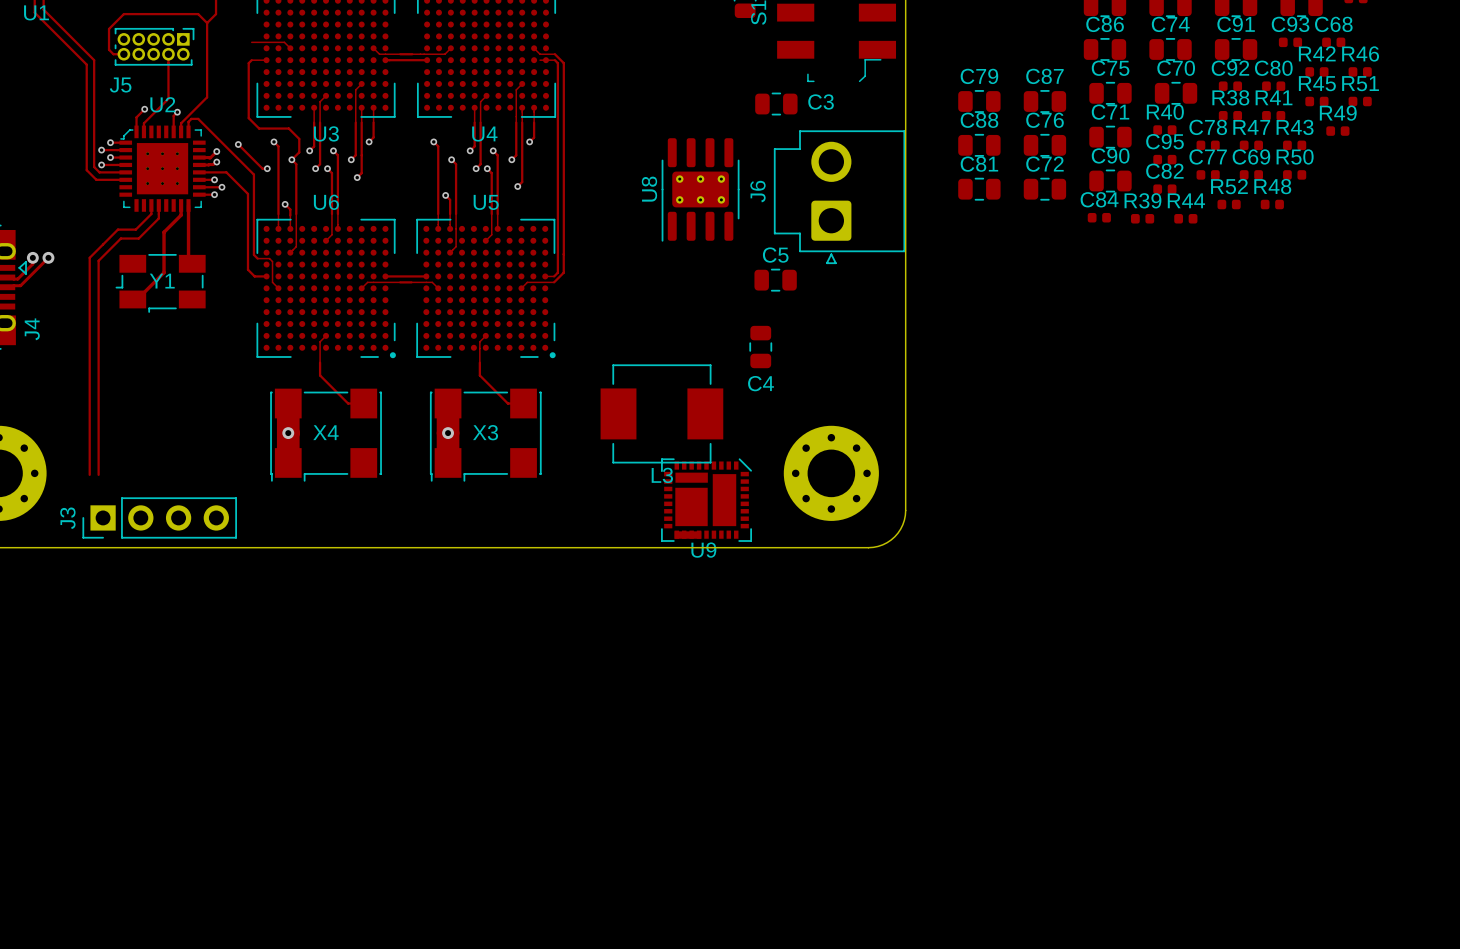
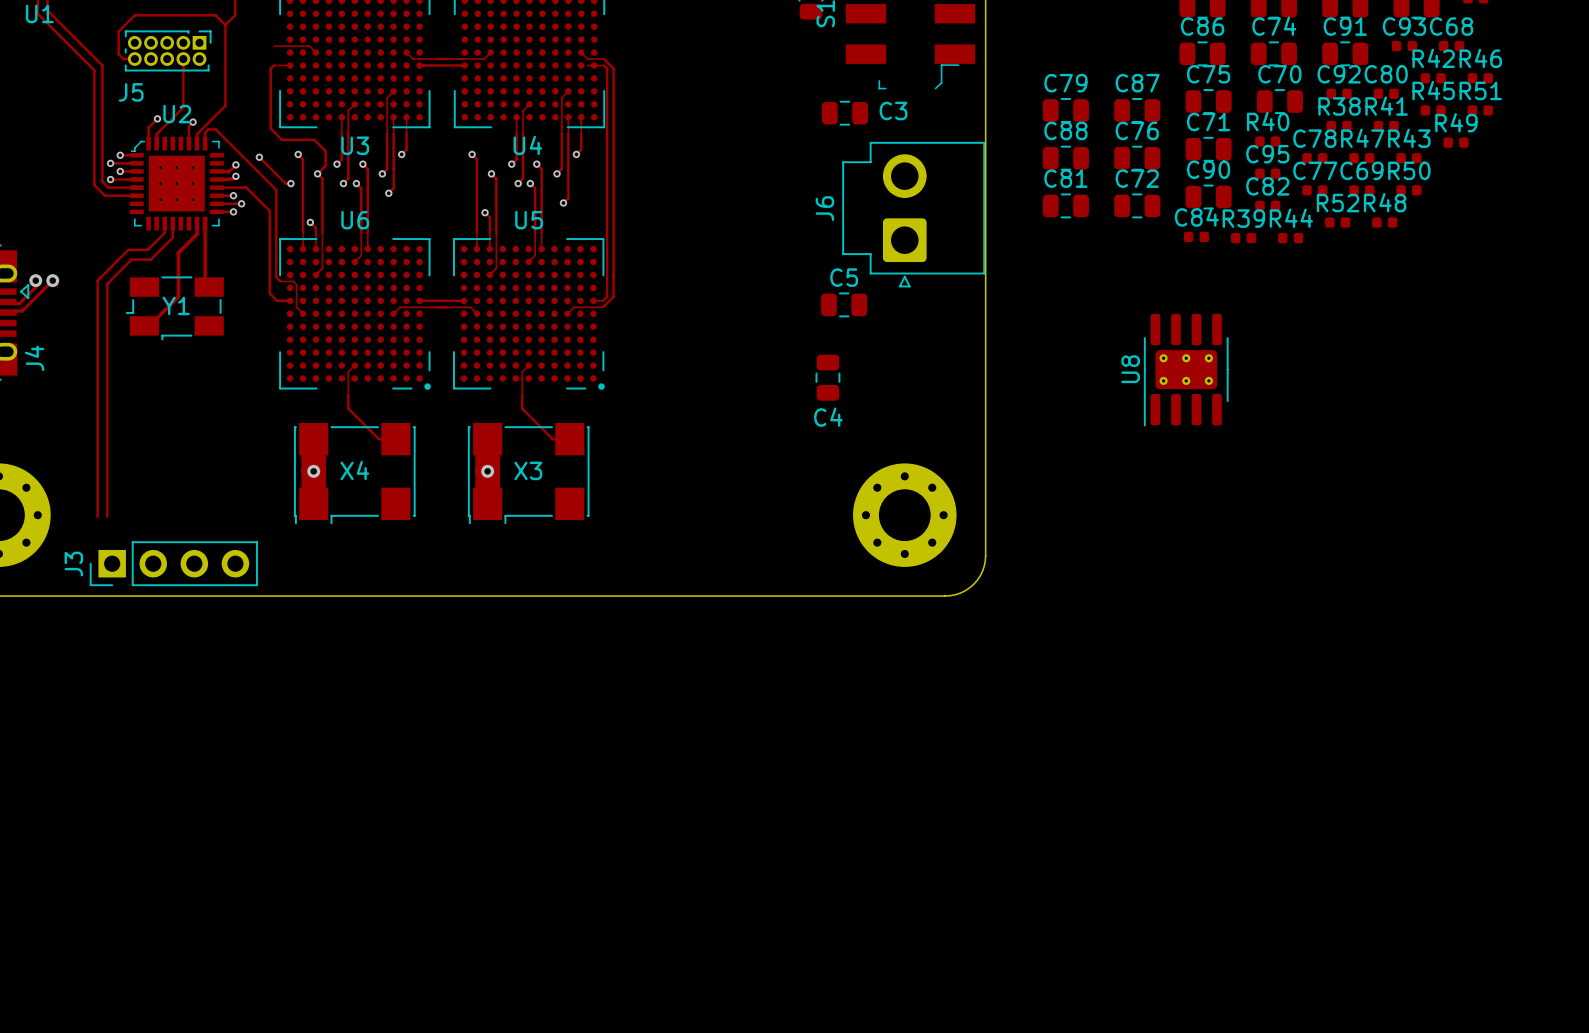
U8 position: (700, 189) -> (1186, 370)
L3: (661, 413) -> none
U9: (706, 500) -> none

